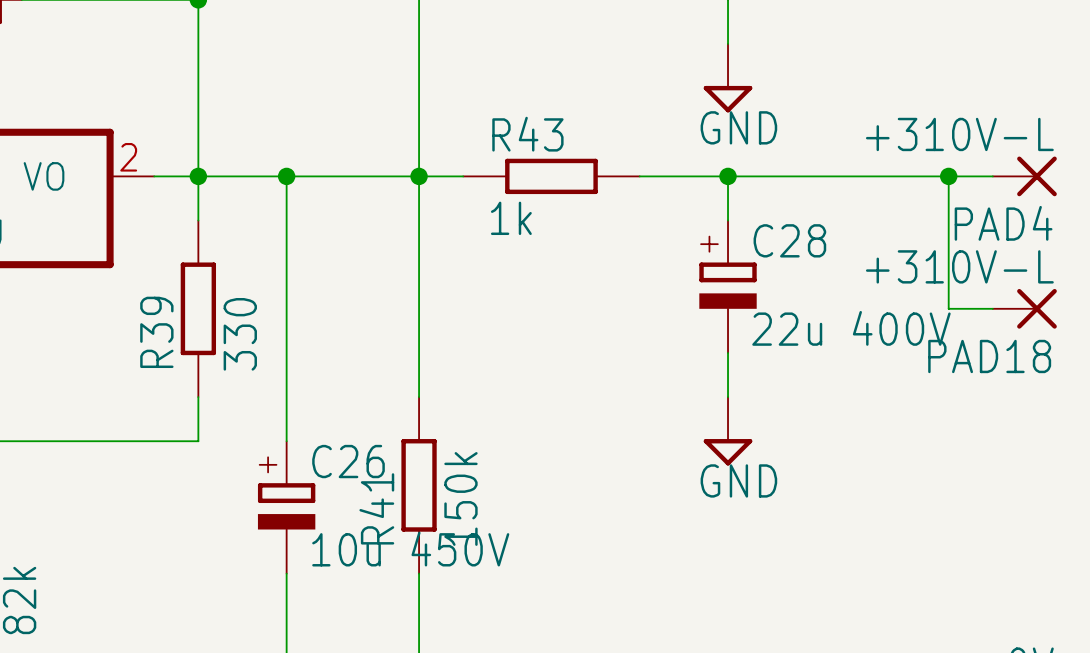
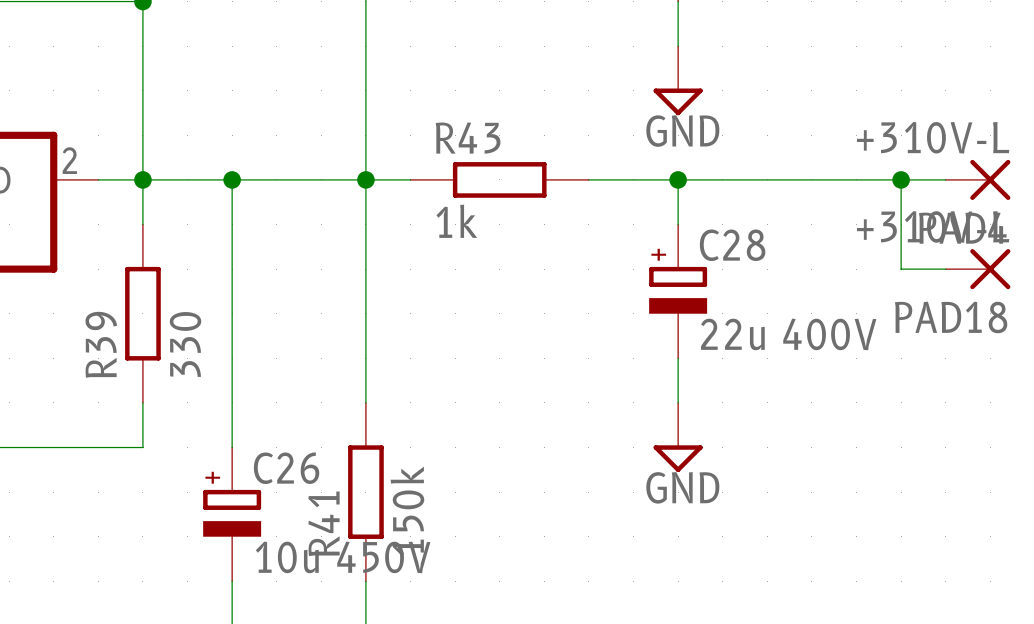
wire: (948, 264) (948, 308) (992, 308) -> (901, 269) (945, 269)
PAD18 position: (1024, 308) -> (978, 269)

